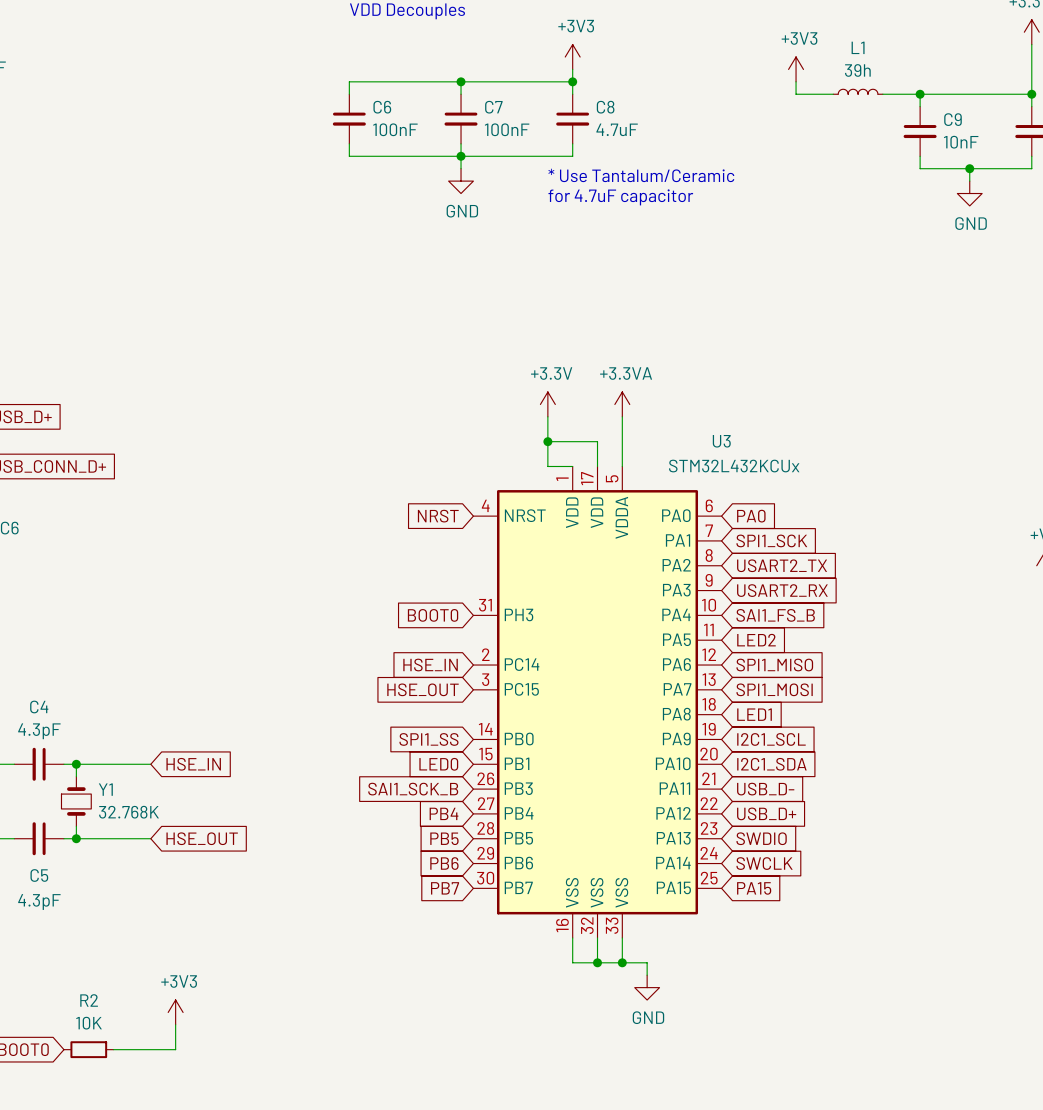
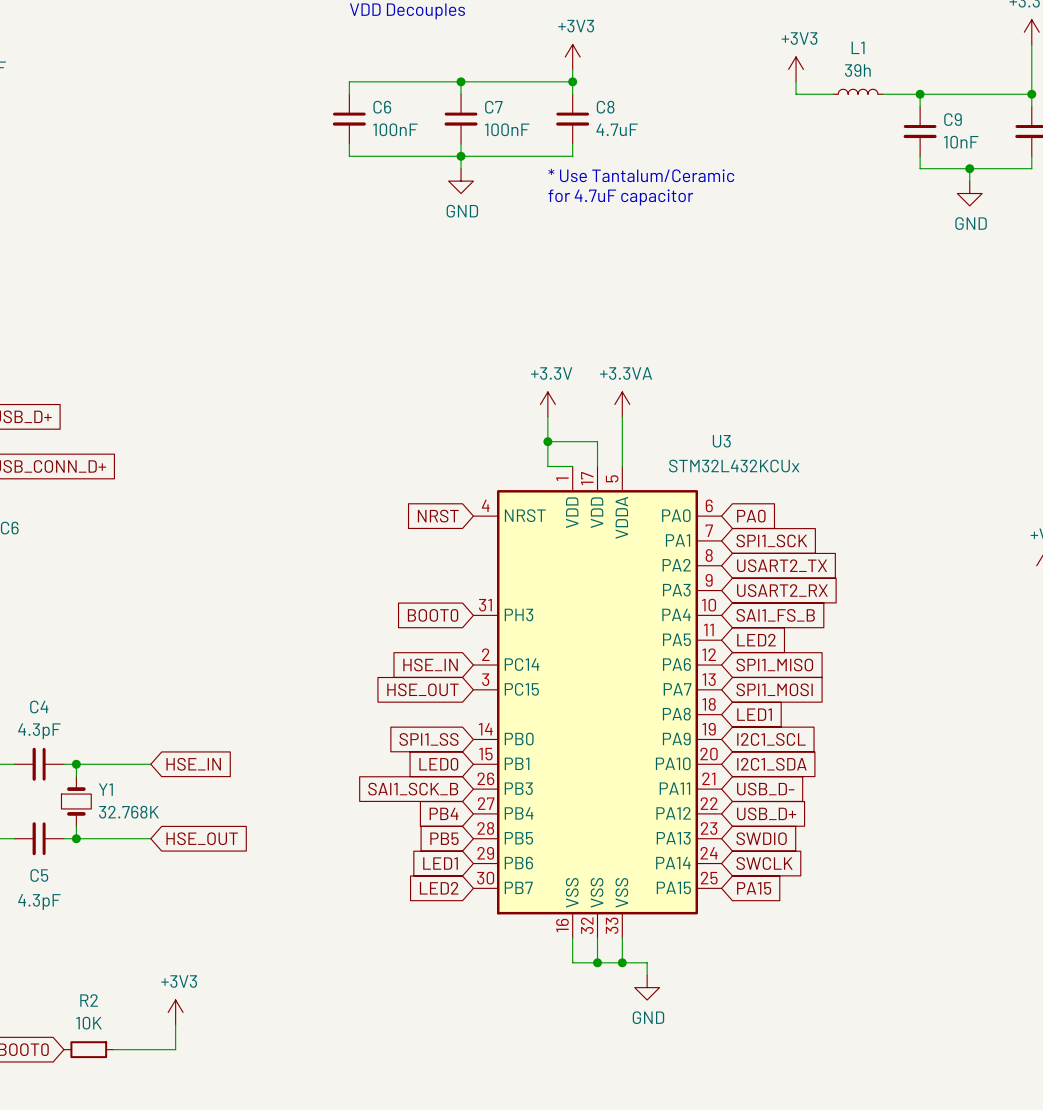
global label: PB6 (444, 863) -> LED1 (440, 863)
global label: PB7 (445, 888) -> LED2 (439, 888)

